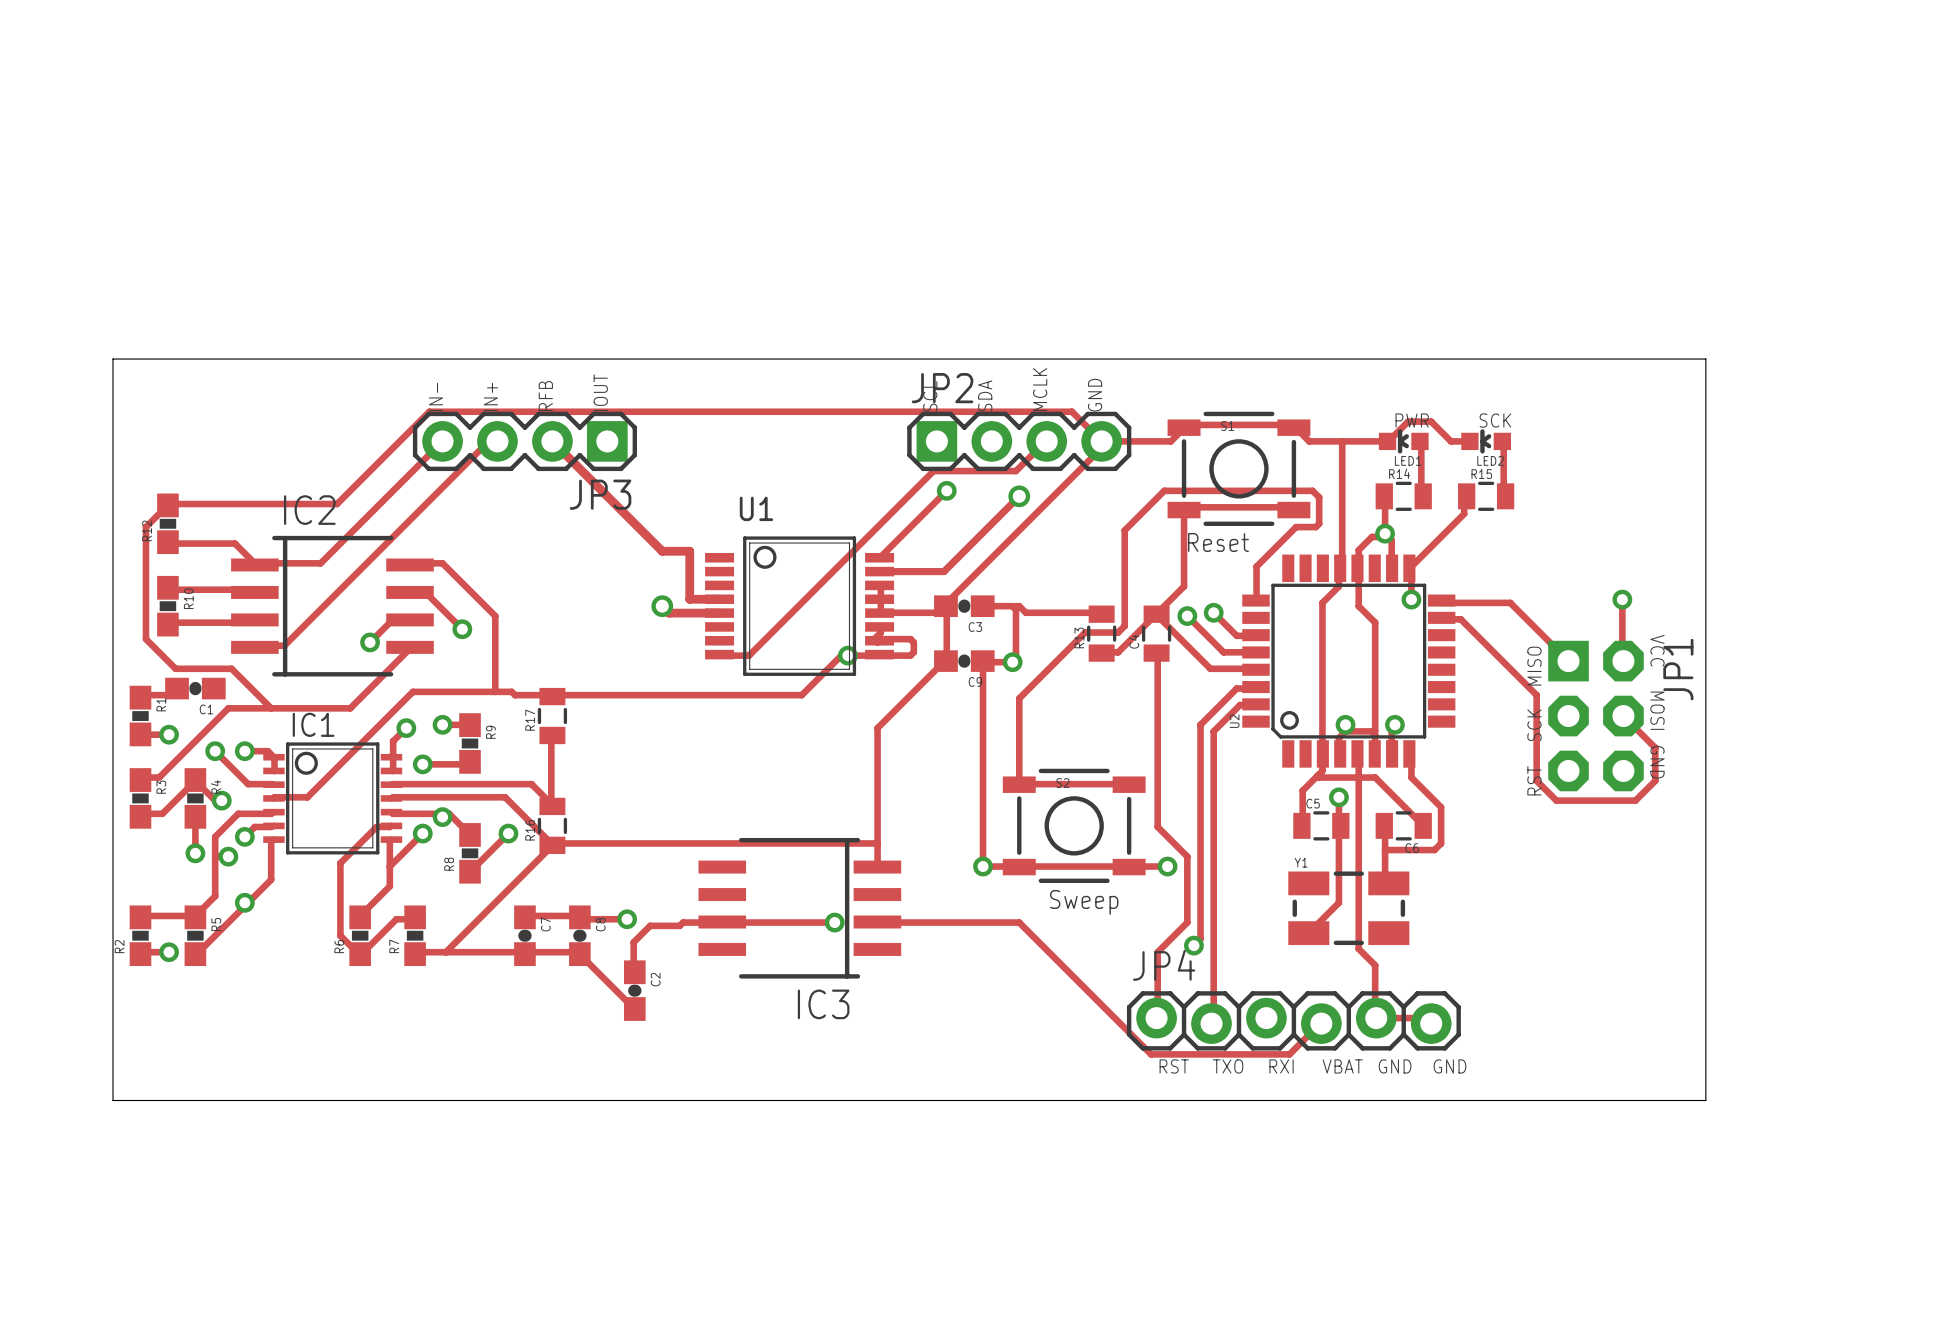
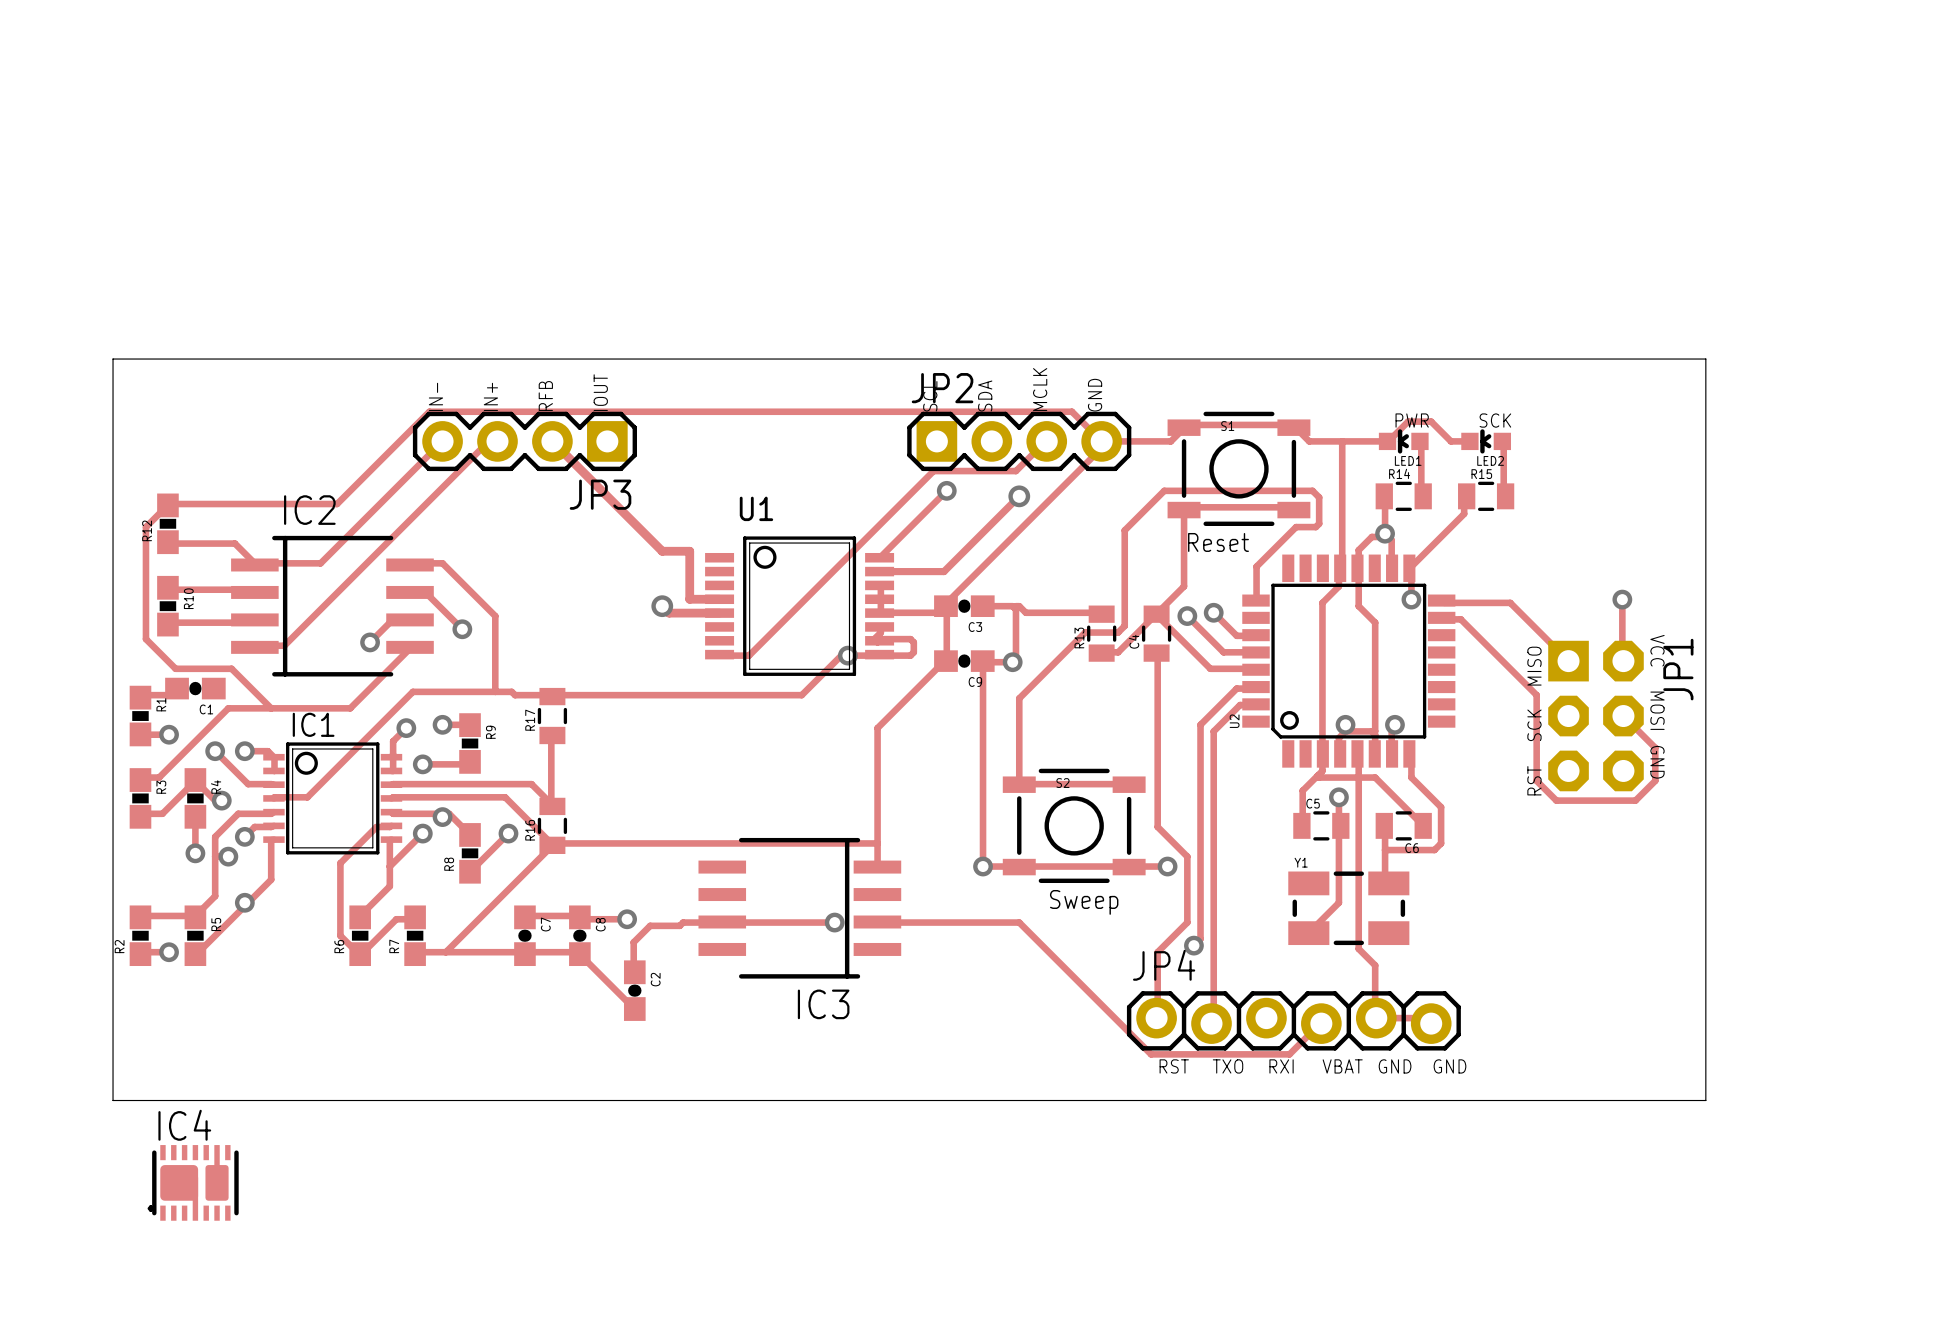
IC4: none -> (195, 1182)

